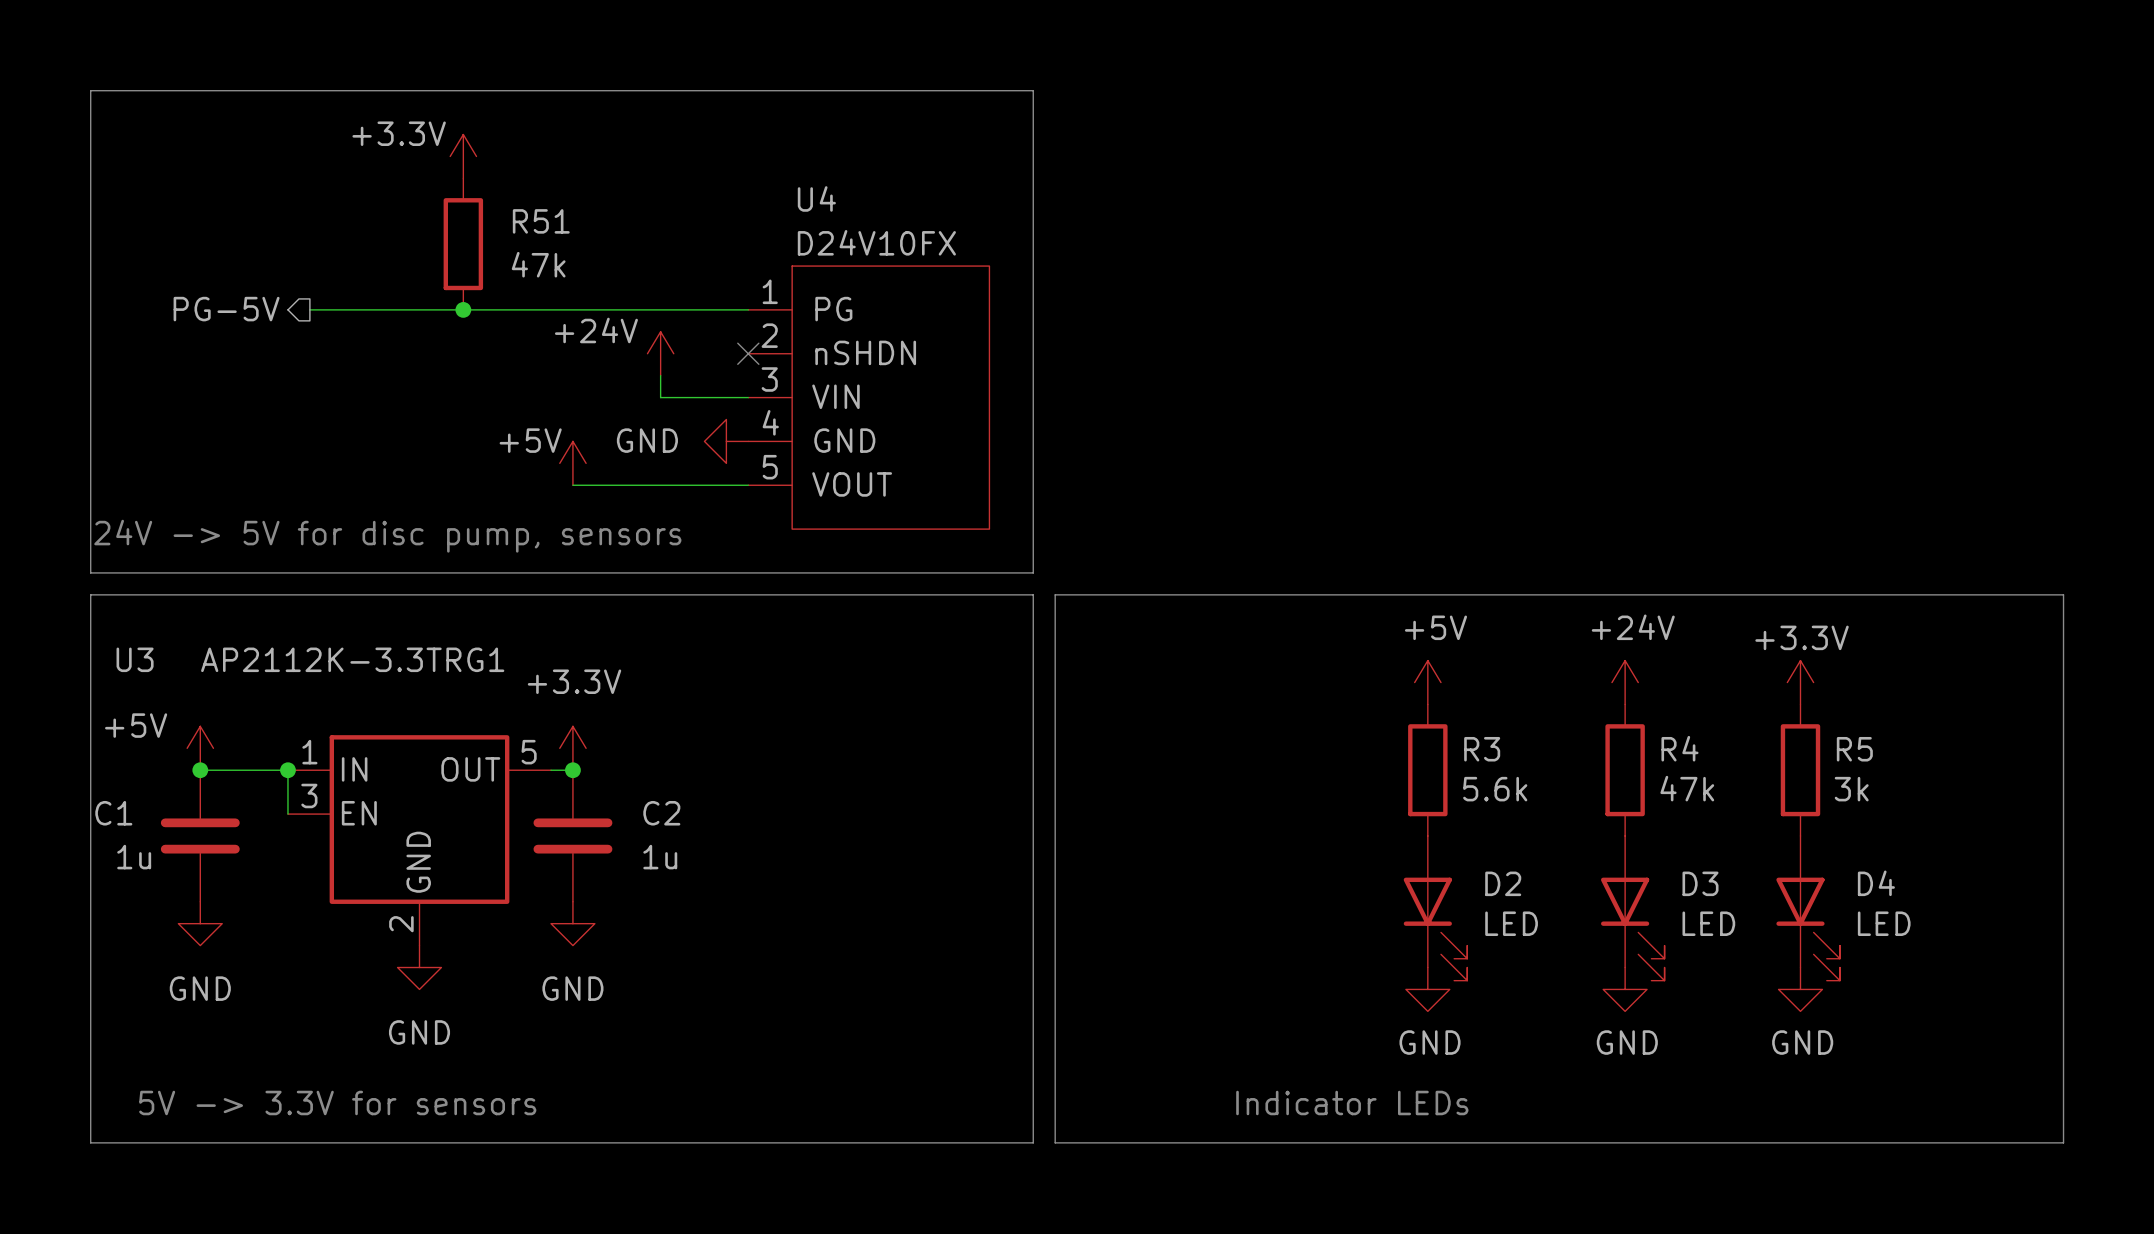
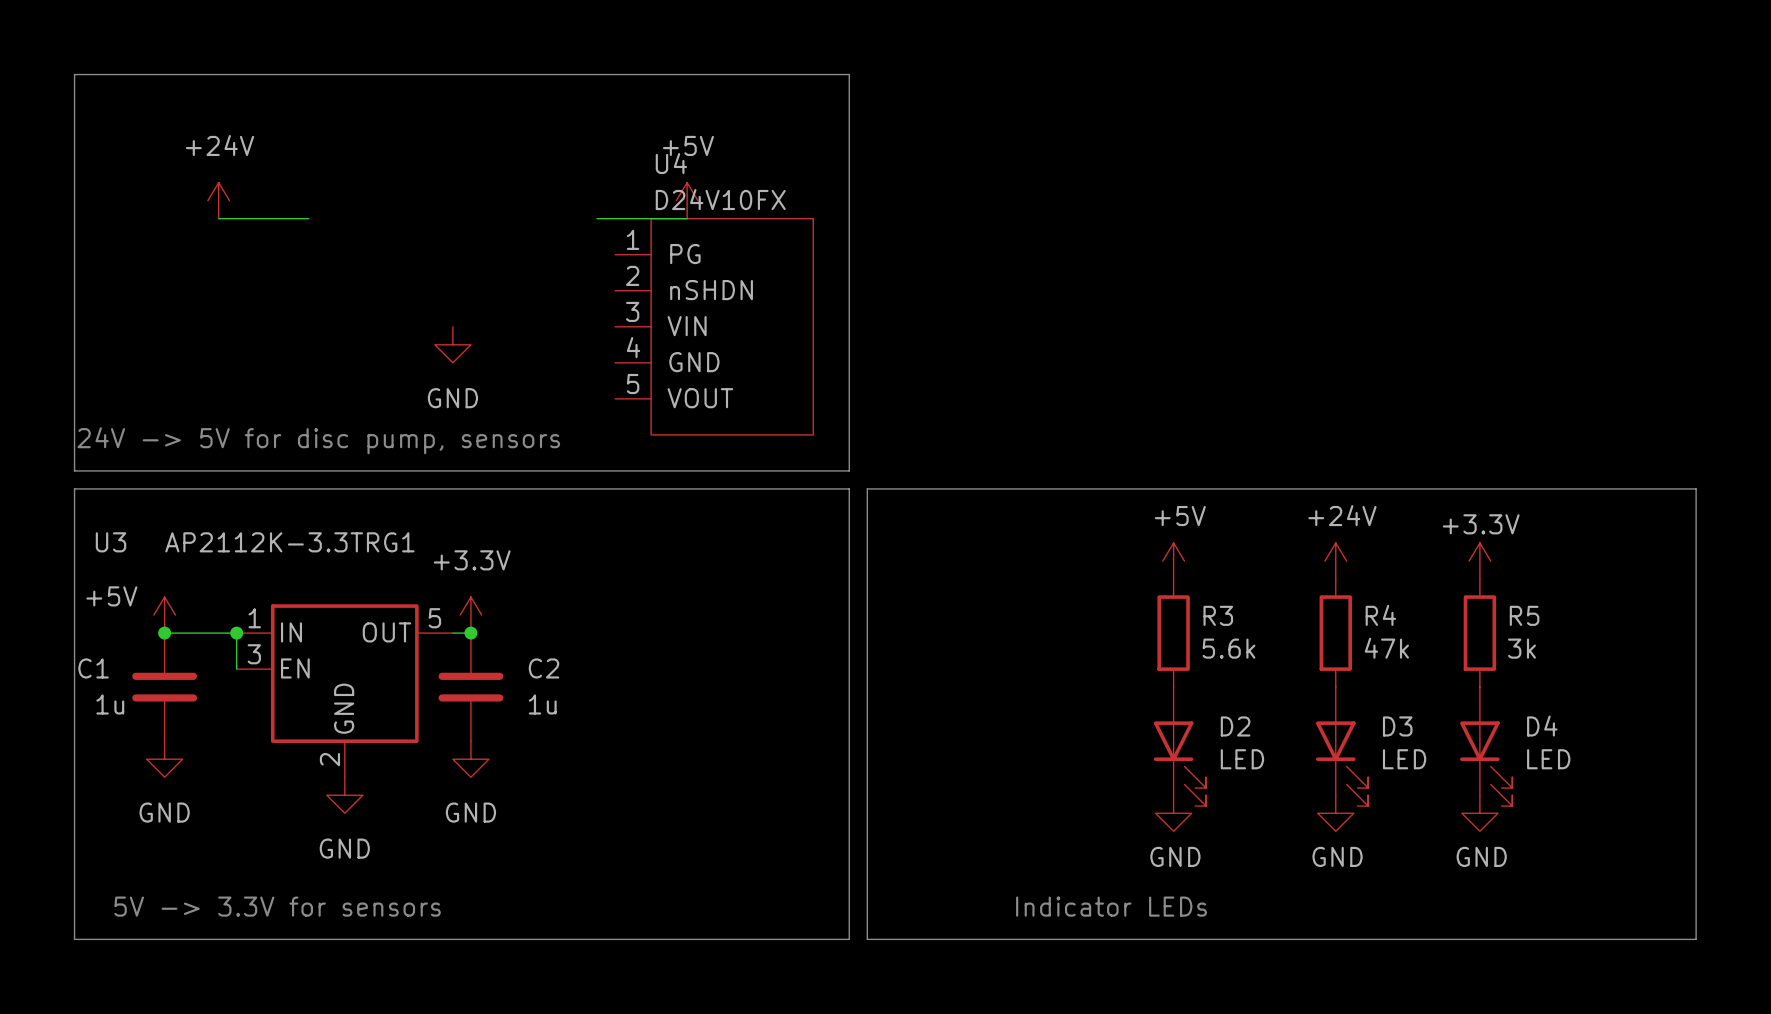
power symbol: +3.3V (463, 156) -> none
R51: 47k (463, 244) -> none
wire: none -> (218, 218) (308, 218)
wire: none -> (597, 218) (687, 218)
hierarchical label: PG-5V (226, 309) -> none
wire: (309, 309) (748, 309) -> none
junction: (463, 309) -> none
power symbol text position: +24V (596, 330) -> +24V (219, 145)
power symbol position: +24V (660, 353) -> +24V (218, 200)
no-connect mark: (748, 353) -> none
wire: (660, 375) (660, 397) (748, 397) -> none
power symbol text position: +5V (530, 440) -> +5V (688, 145)
power symbol rotation: 0° (726, 441) -> 90° counterclockwise (452, 344)
power symbol position: GND (726, 441) -> GND (452, 344)
power symbol position: +5V (572, 463) -> +5V (687, 200)
wire: (572, 485) (748, 485) -> none

